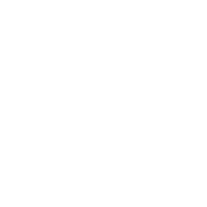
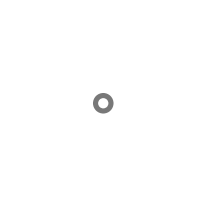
via: none -> (103, 103)

